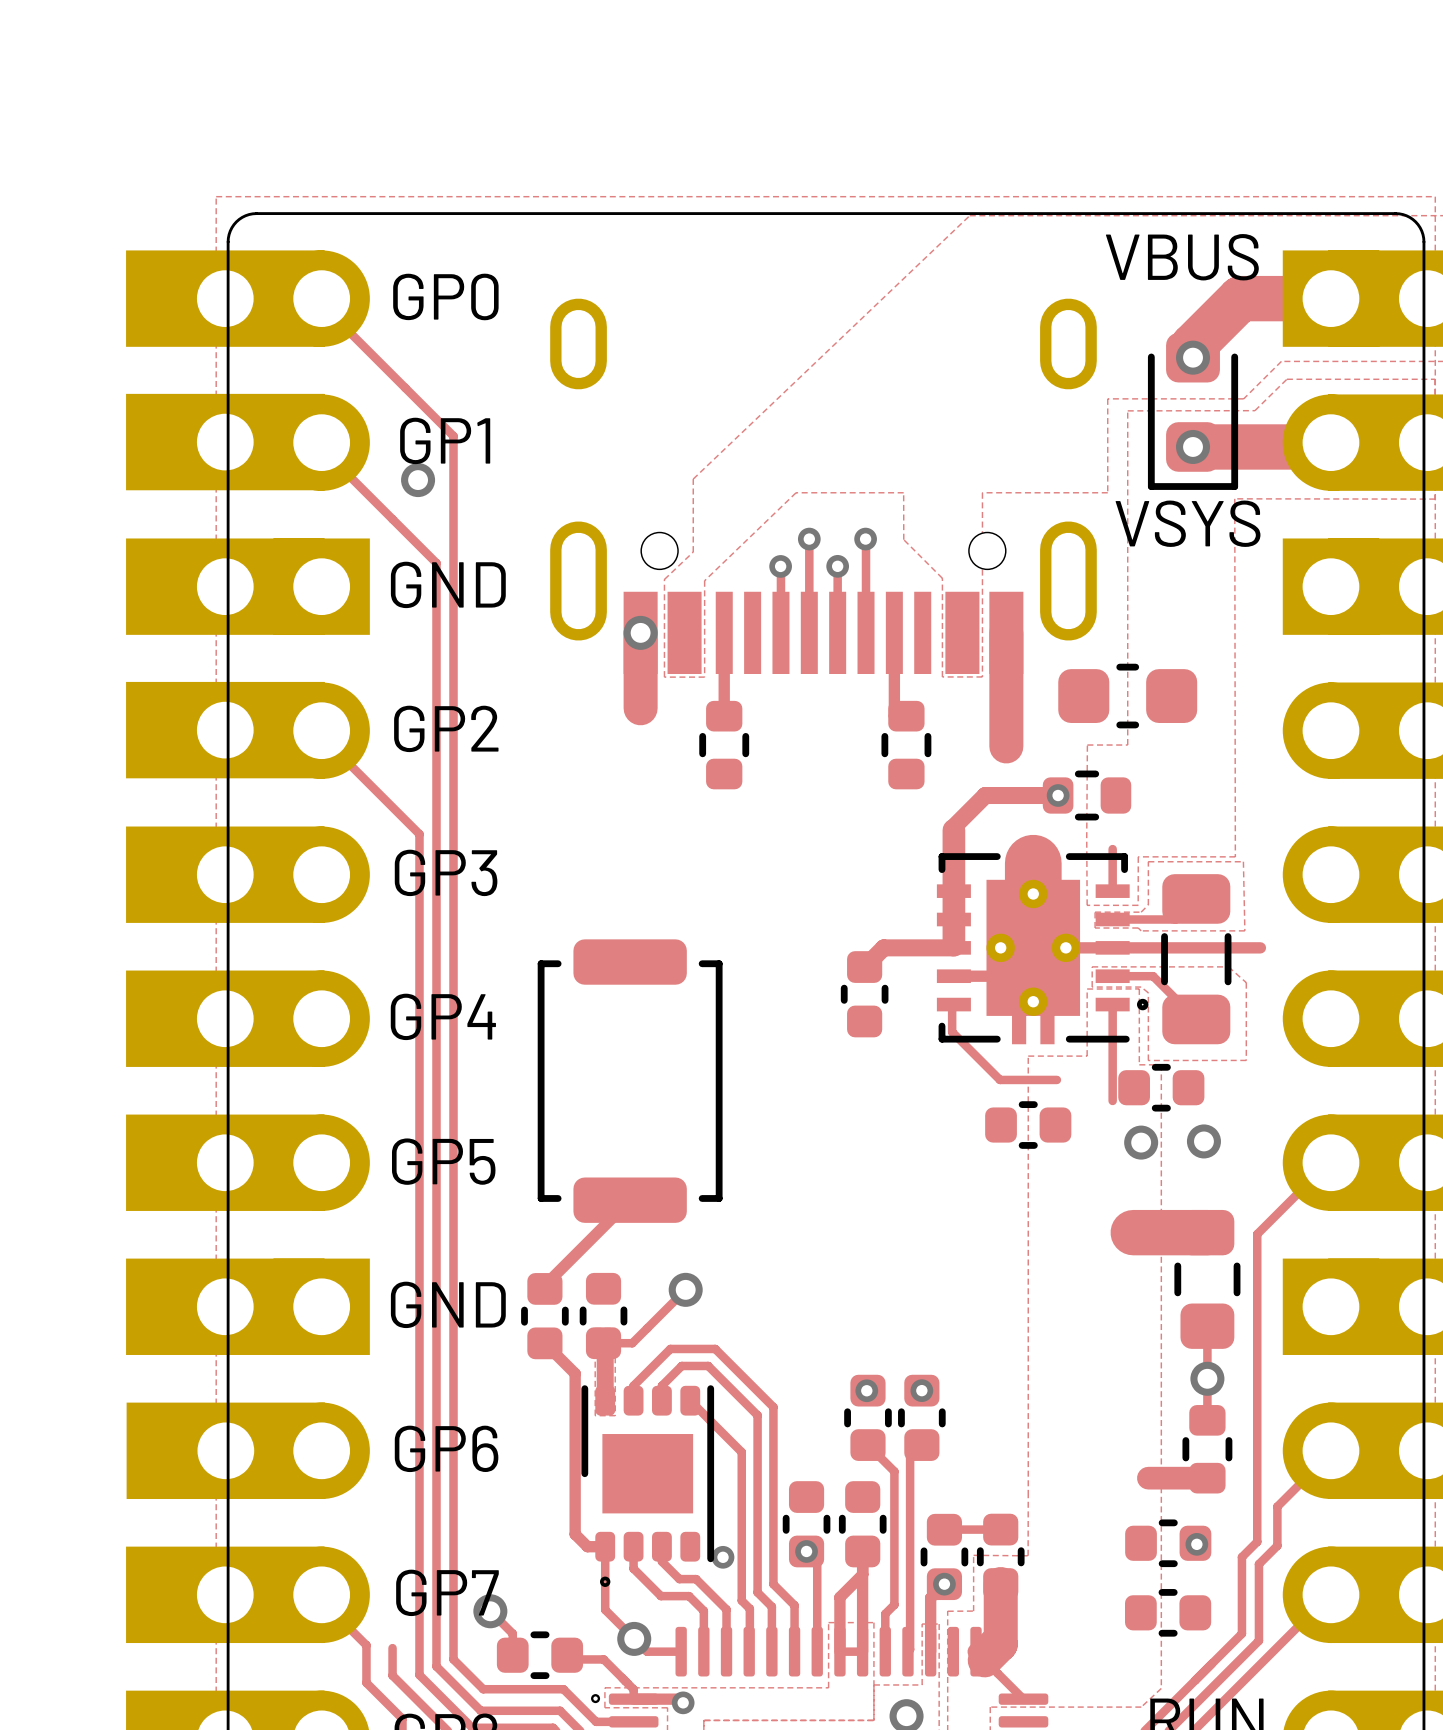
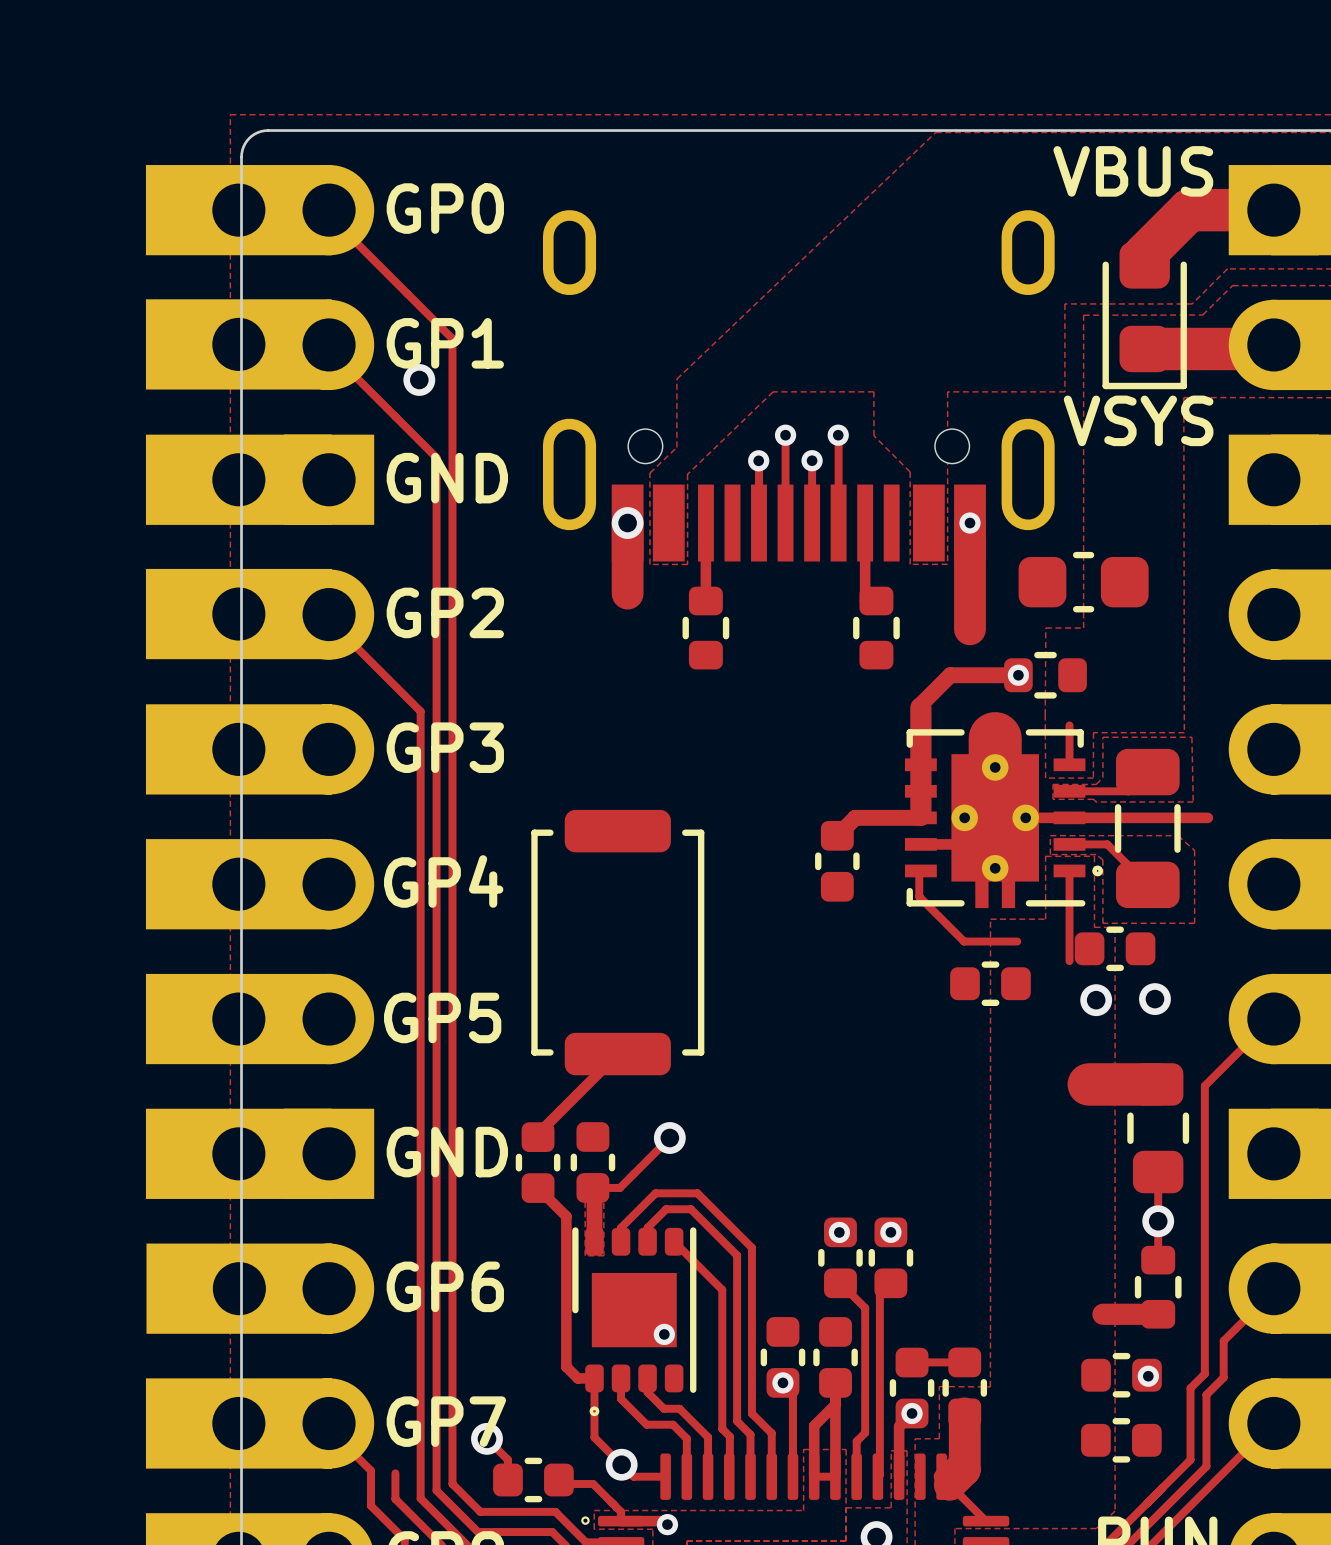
via: (1193, 357) -> none
via: (1193, 446) -> none
via: none -> (969, 523)
via position: (723, 1557) -> (664, 1334)

